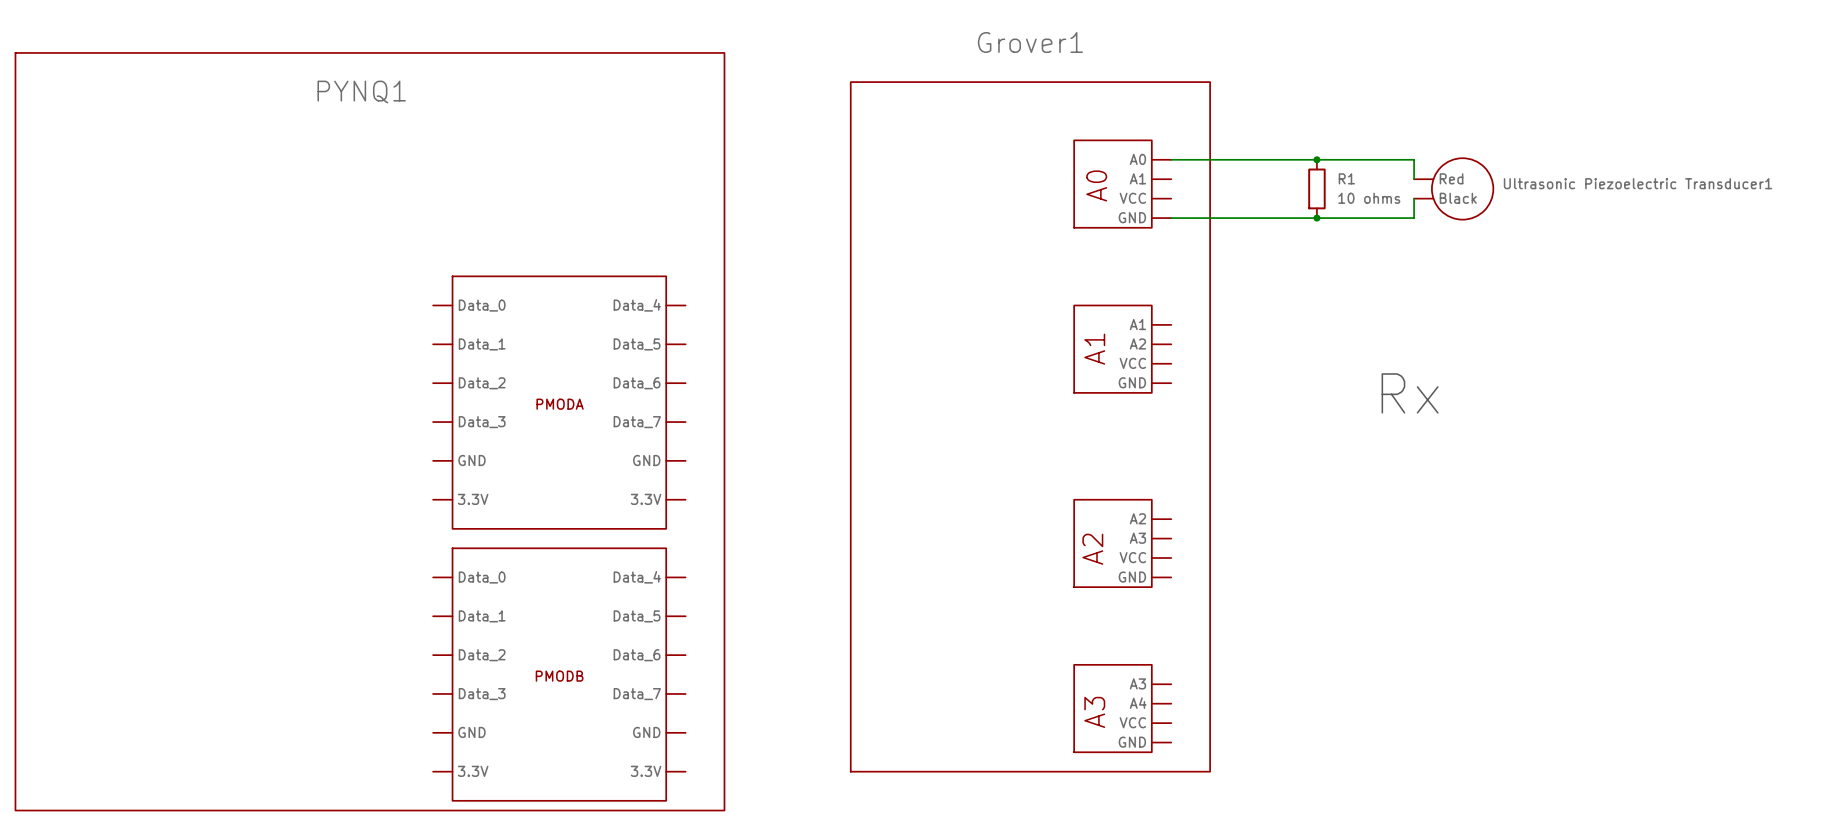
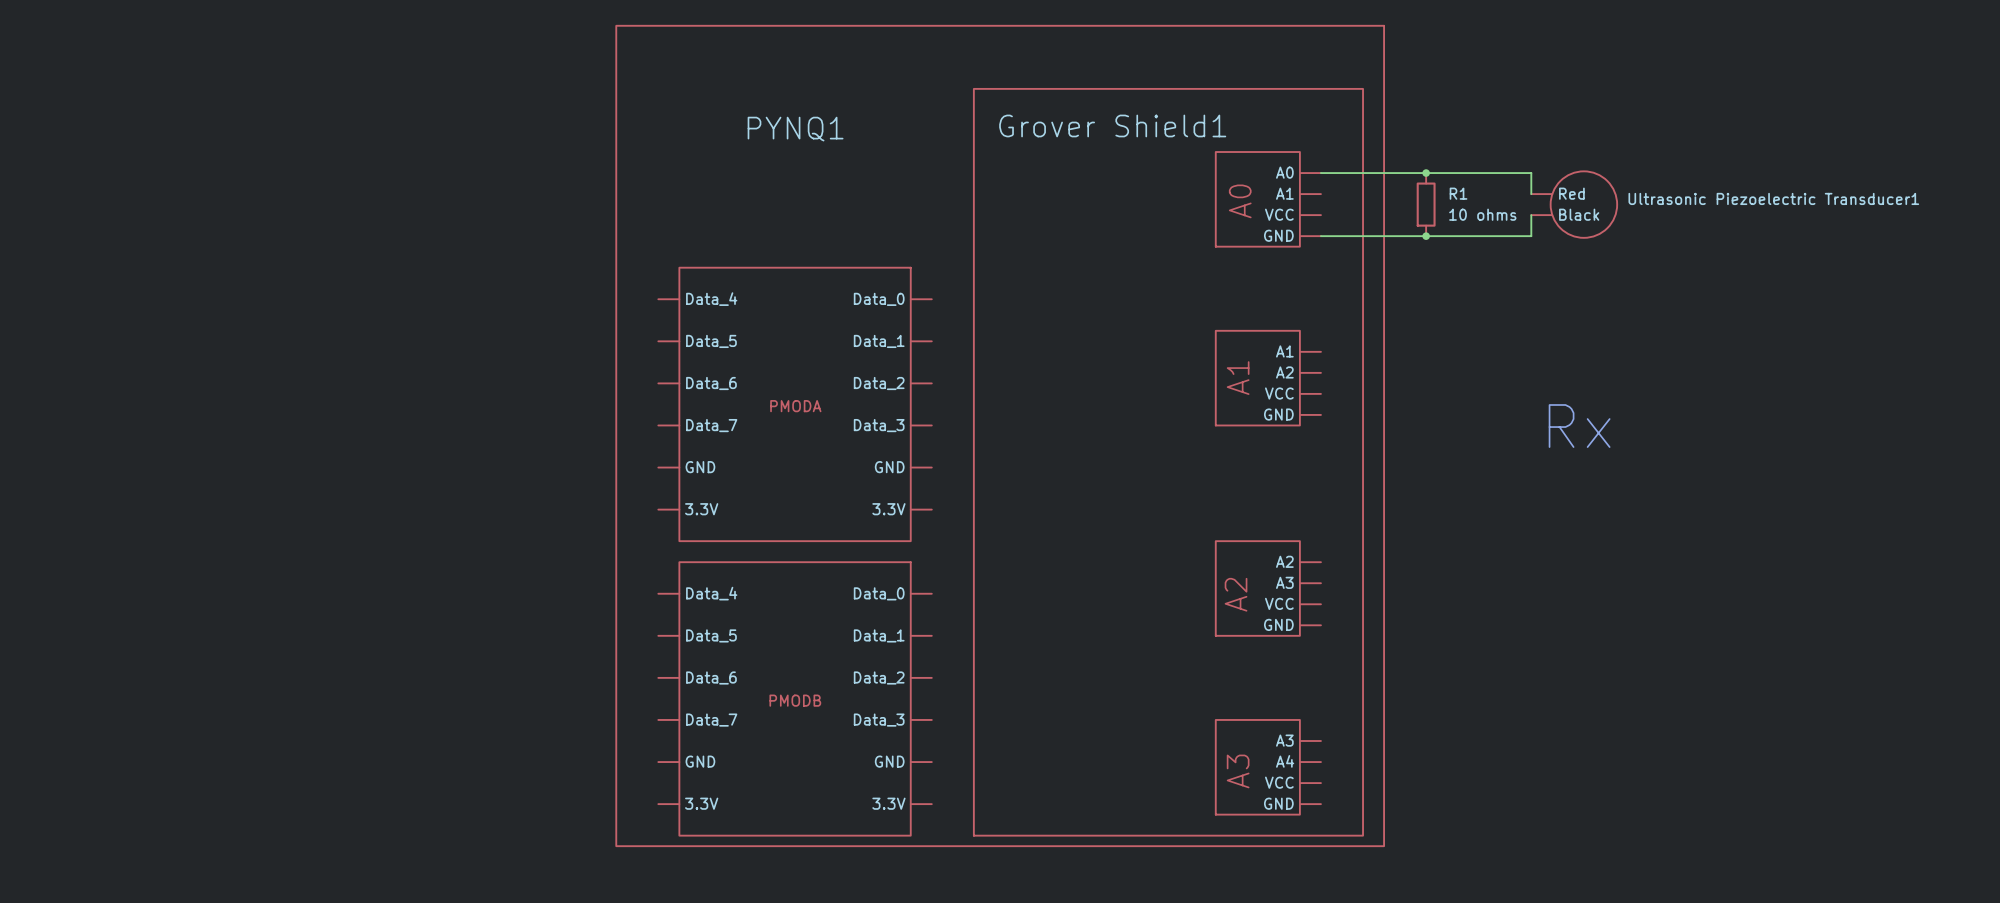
PYNQ1 name position: PYNQ1 (361, 92) -> PYNQ1 (795, 129)
text position: Rx (1410, 393) -> Rx (1579, 426)
Grover1: (1030, 426) -> none
Grover Shield1: none -> (1168, 462)
PYNQ1 flip: as is (369, 431) -> left-right (1000, 435)
PYNQ1 position: (369, 431) -> (1000, 435)

